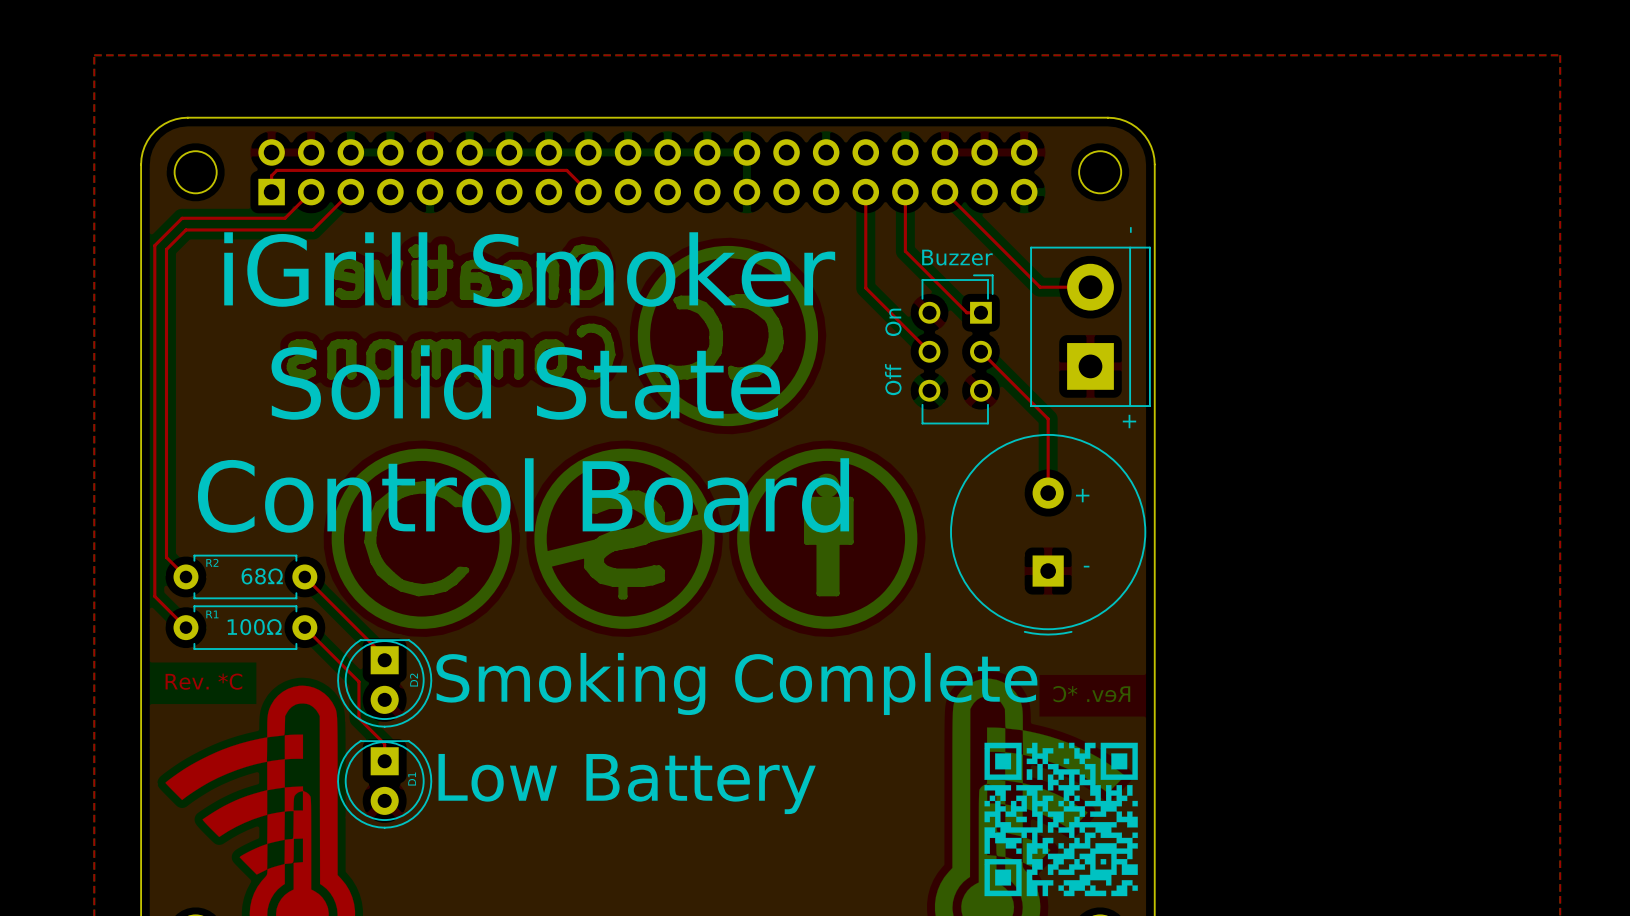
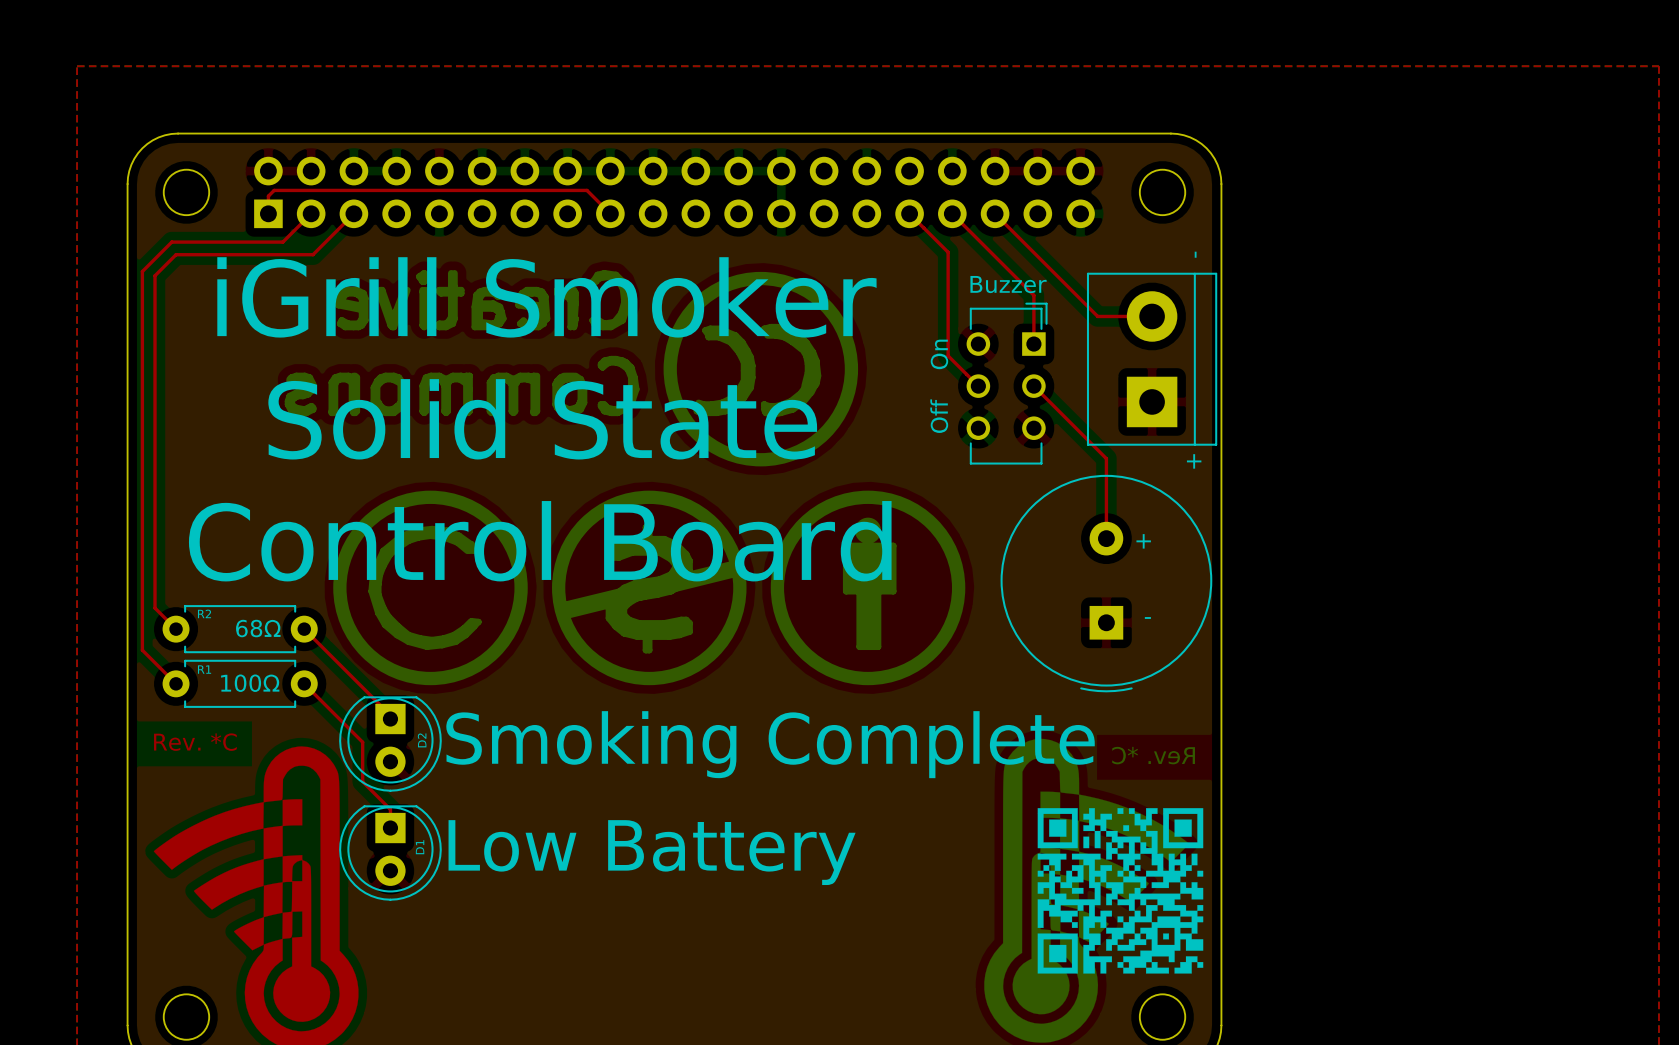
top track: (865, 192) (865, 288) (901, 323) -> (909, 213) (948, 252) (948, 355)
top track: (905, 192) (905, 251) (966, 312) (980, 312) -> (952, 213) (1033, 295) (1033, 344)

